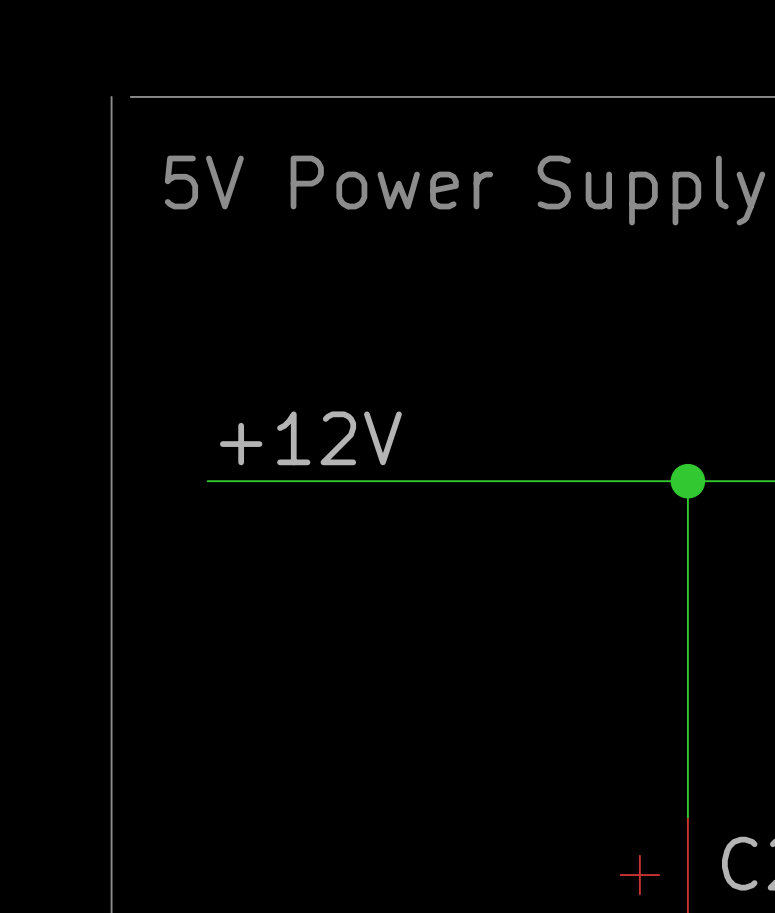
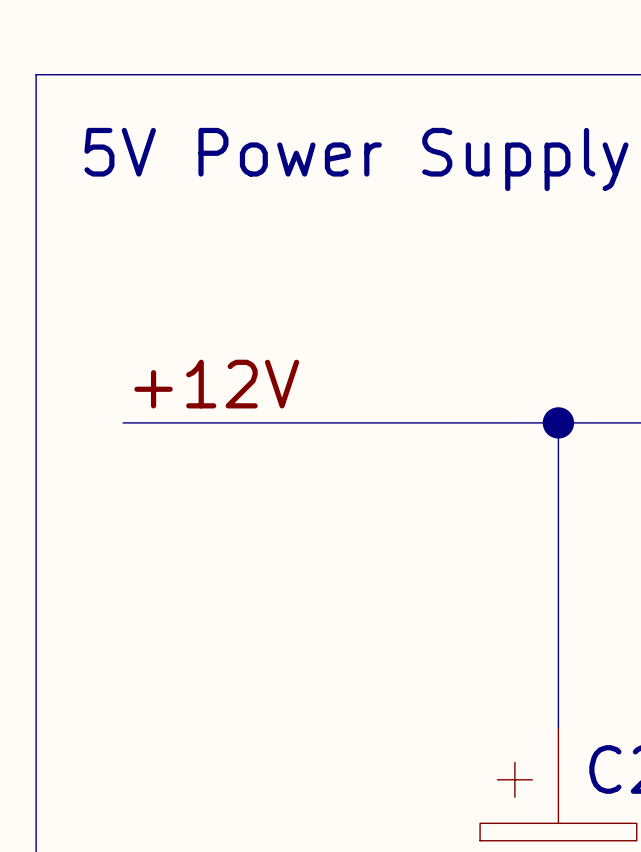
line: none -> (36, 74) (53, 74)

